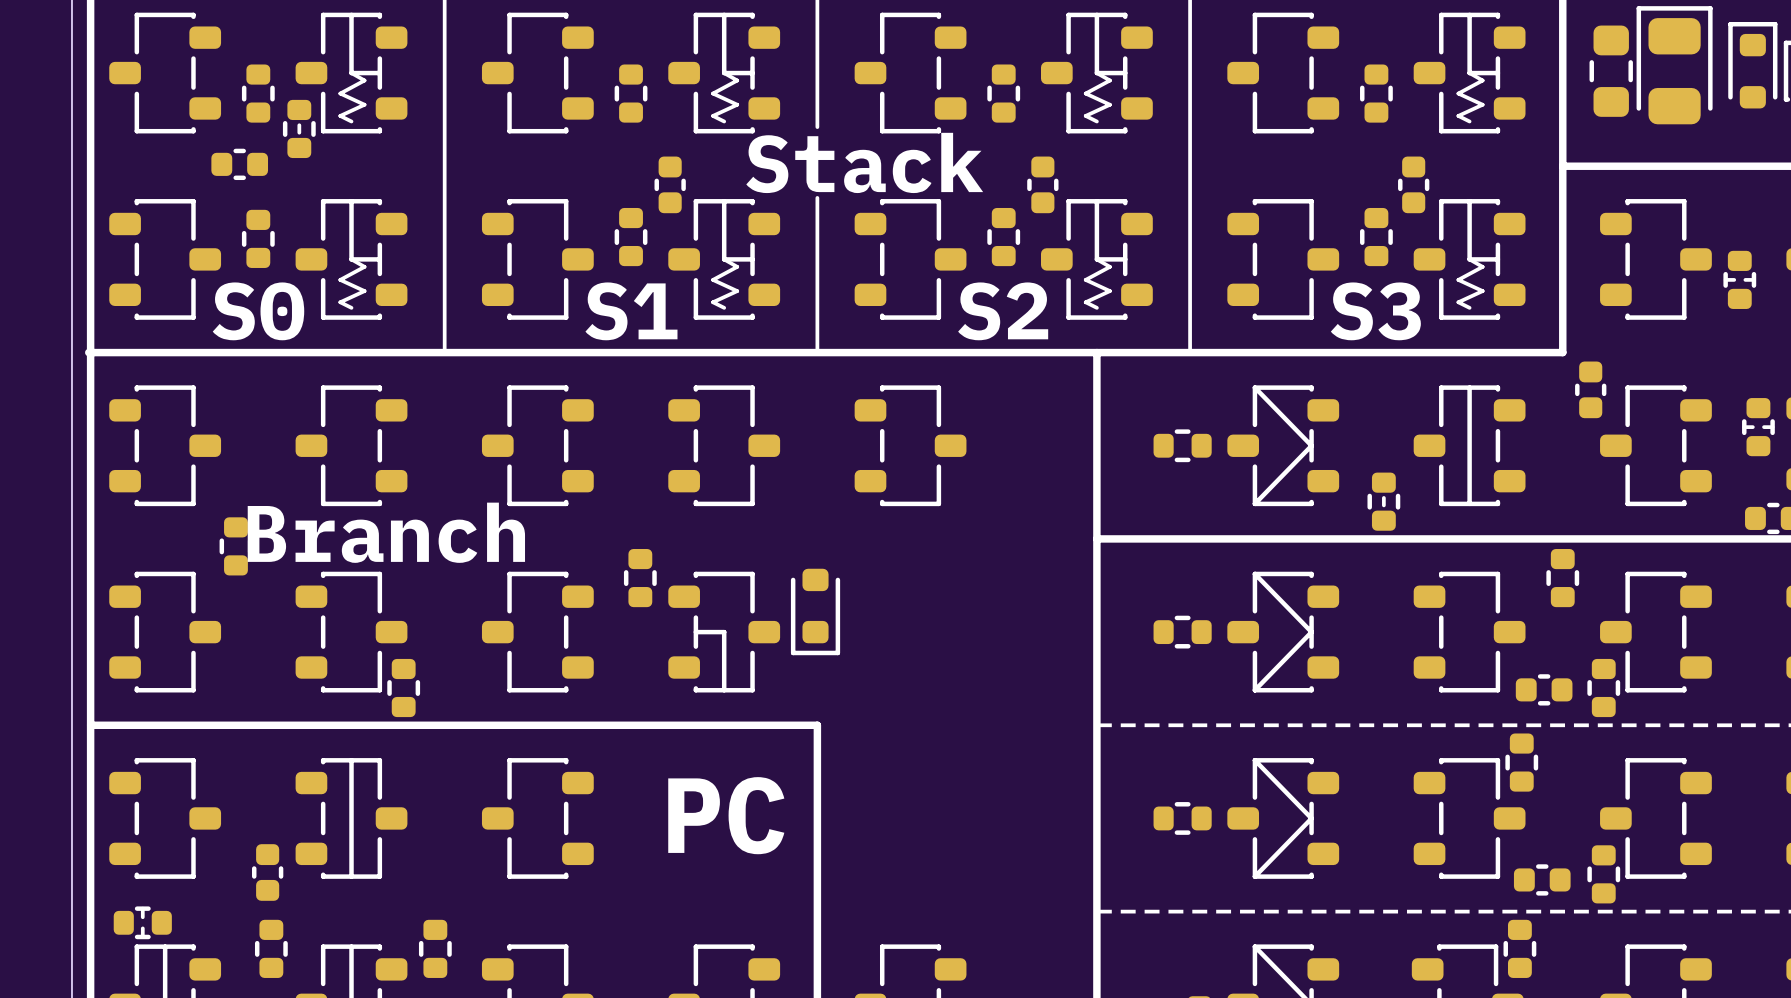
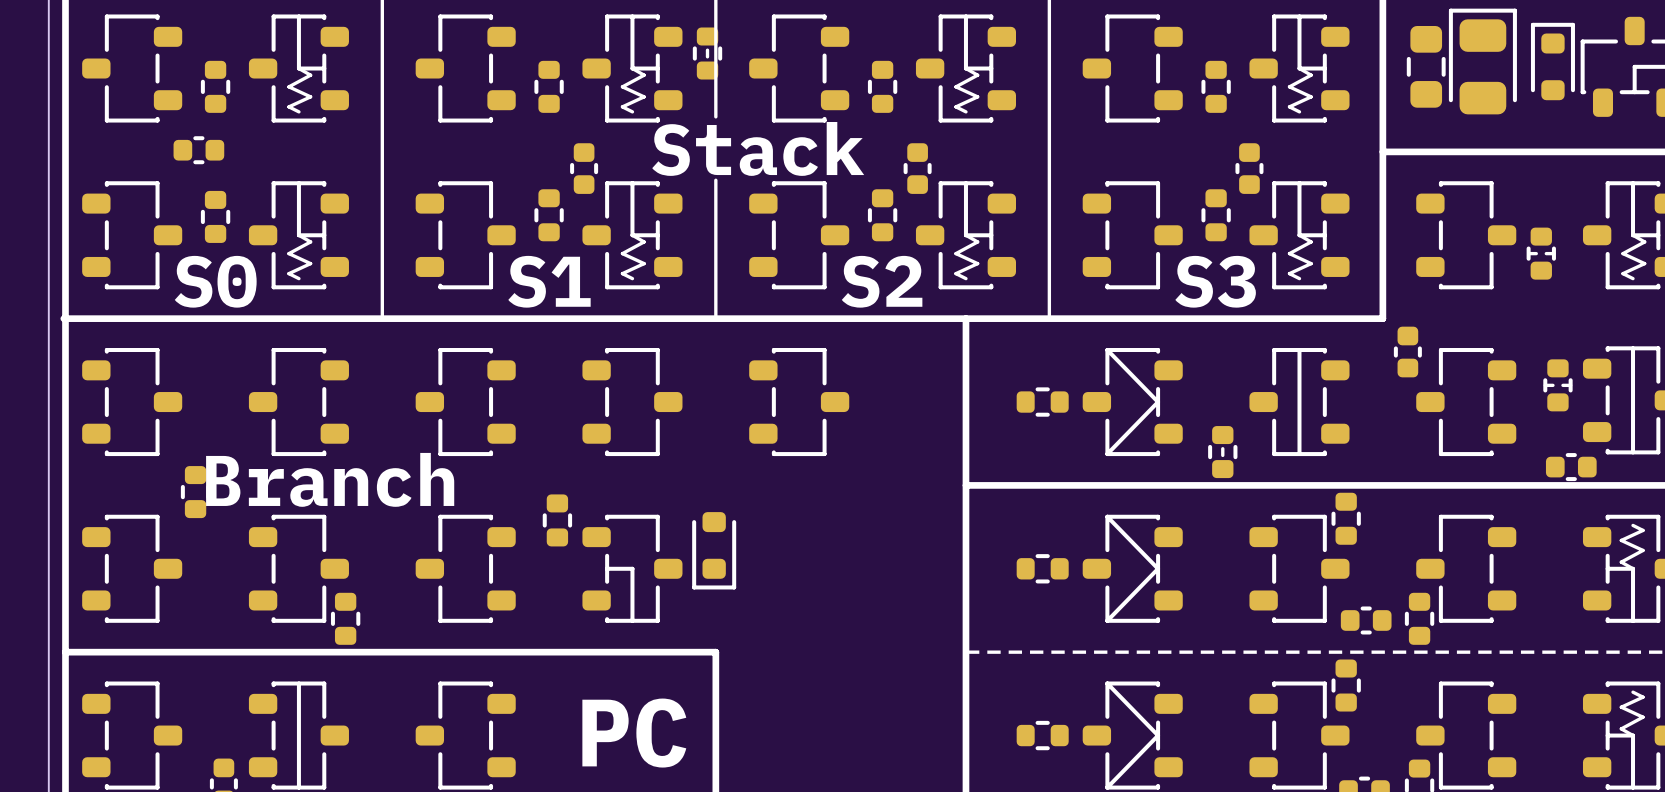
part position: (299, 128) -> (707, 53)
part position: (1562, 578) -> (1346, 518)

